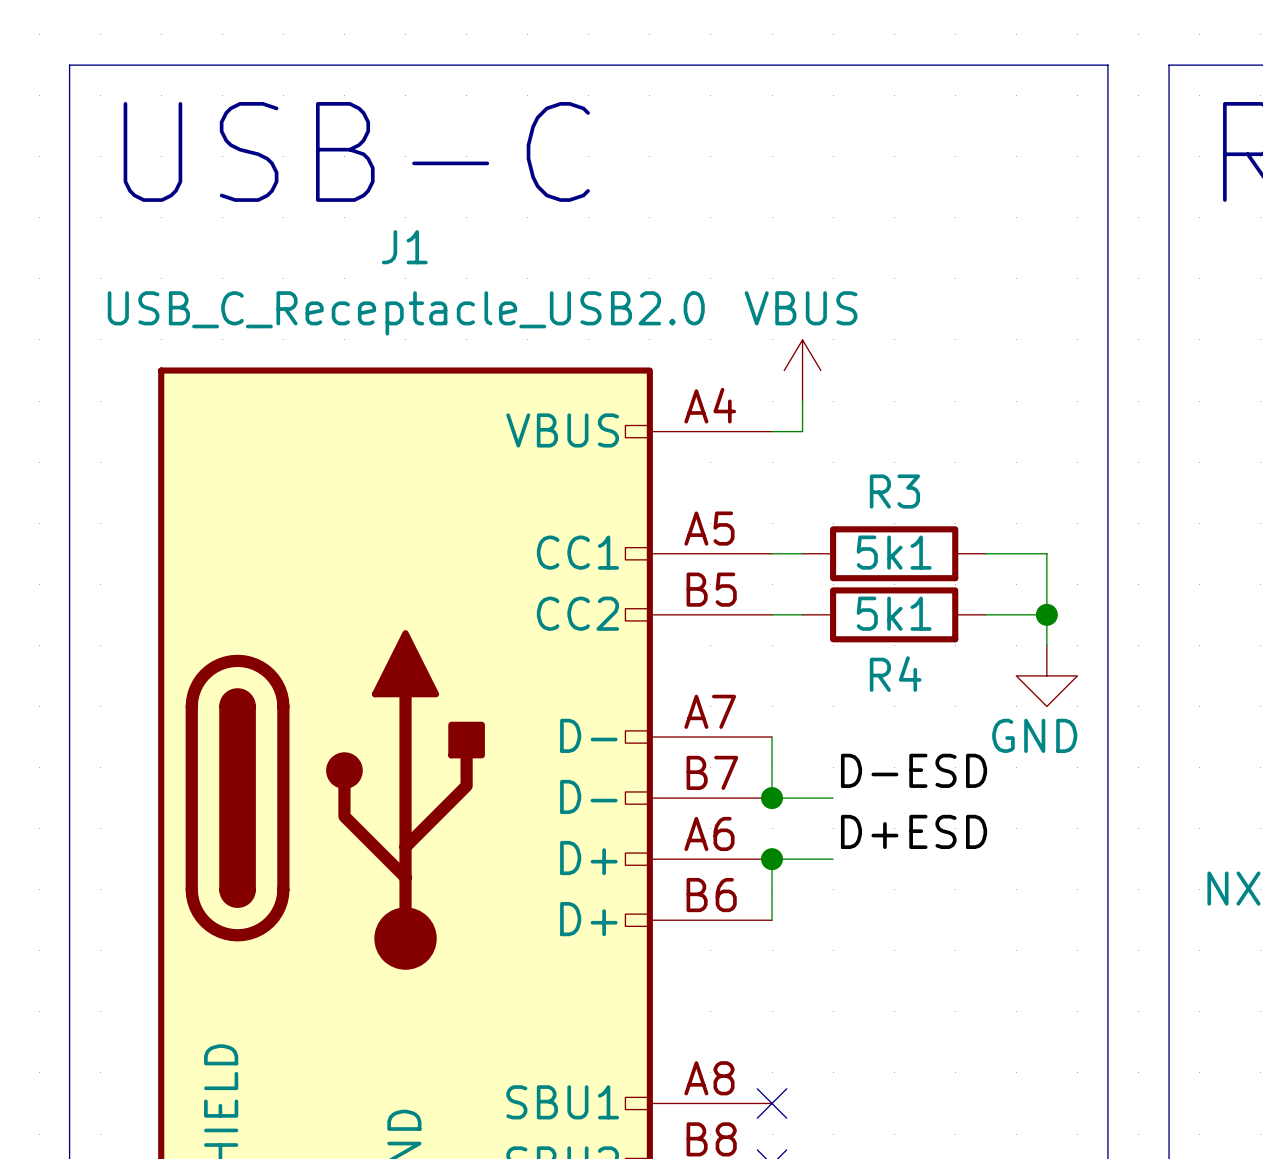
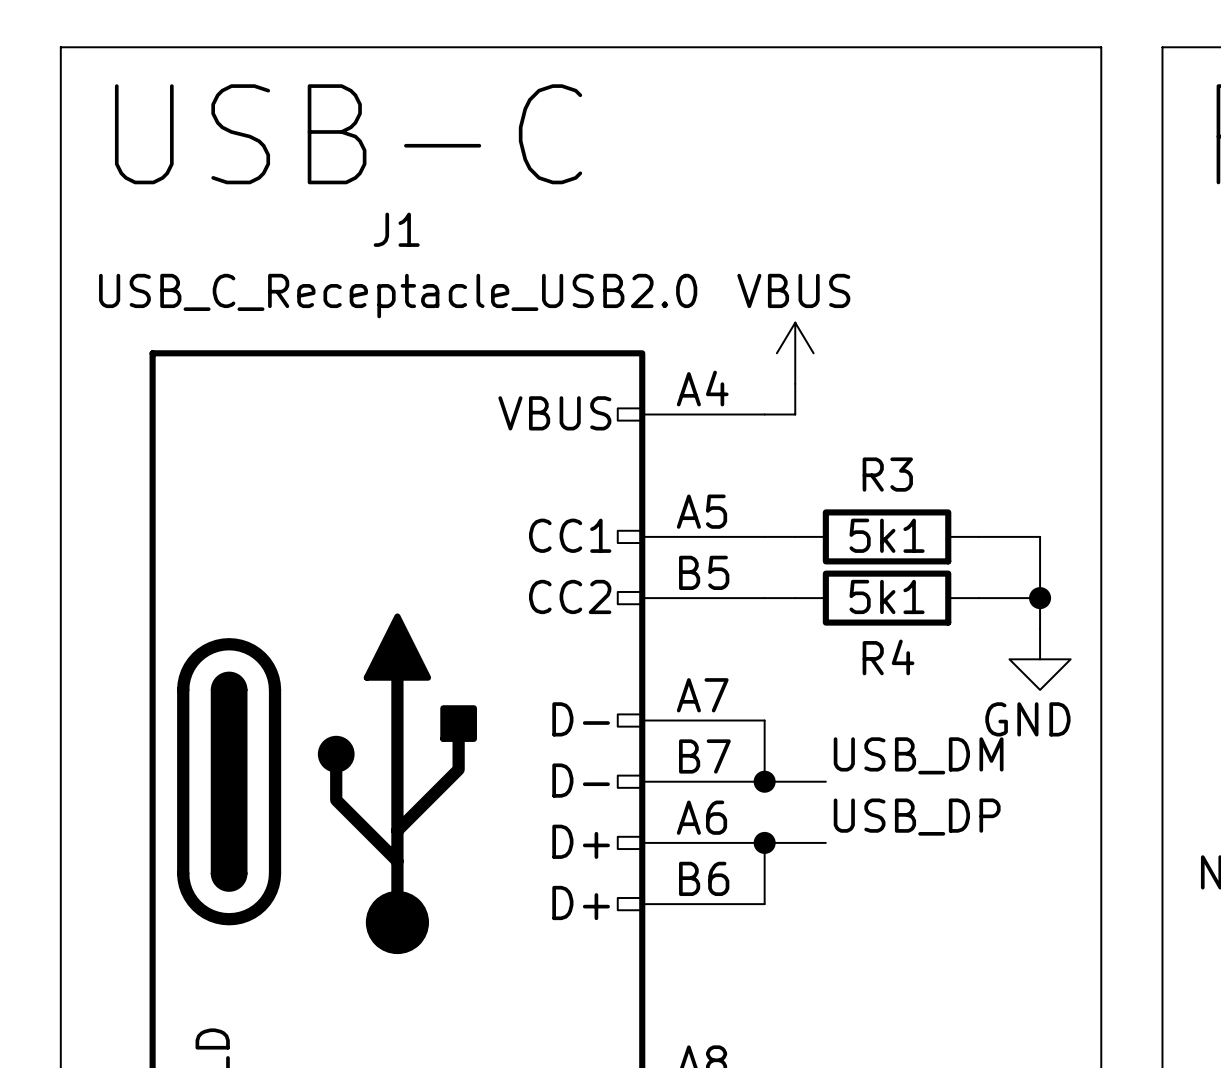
label: D-ESD (914, 770) -> USB_DM (918, 755)
label: D+ESD (914, 831) -> USB_DP (917, 817)

